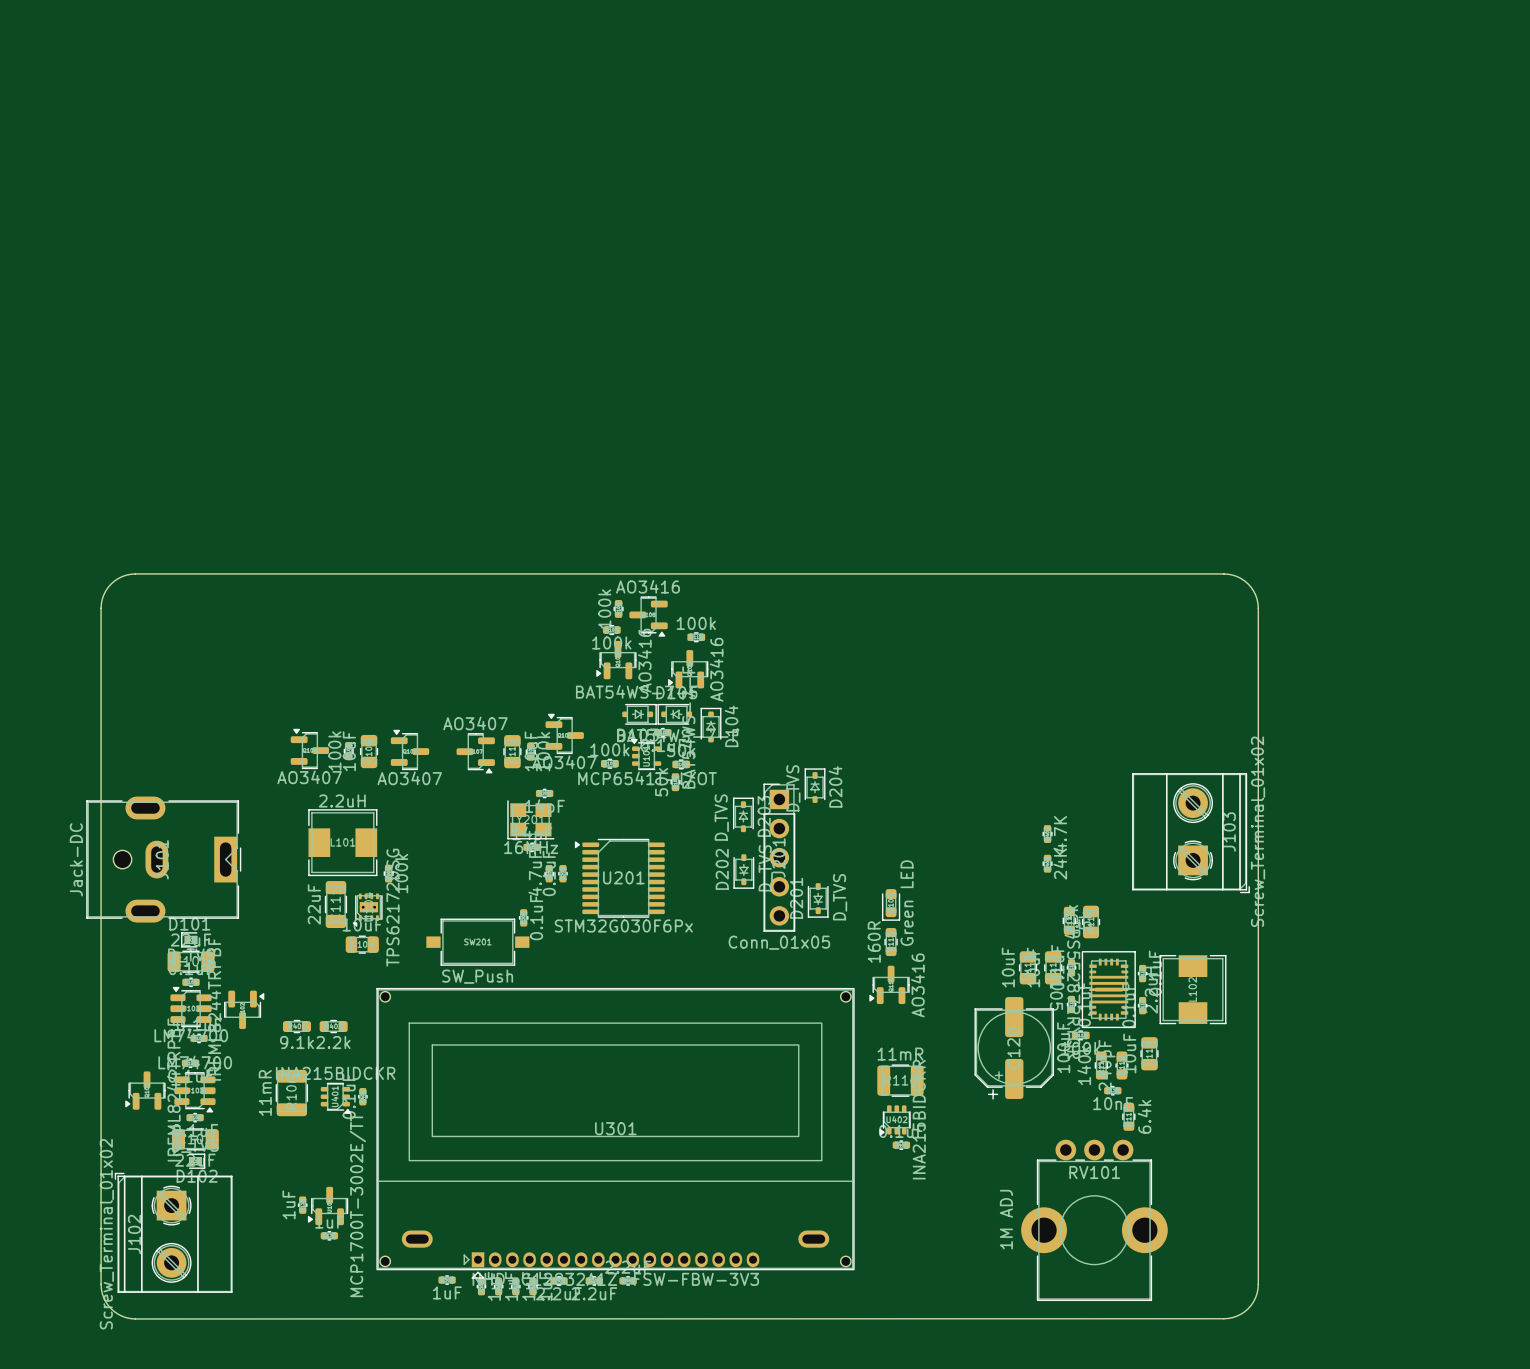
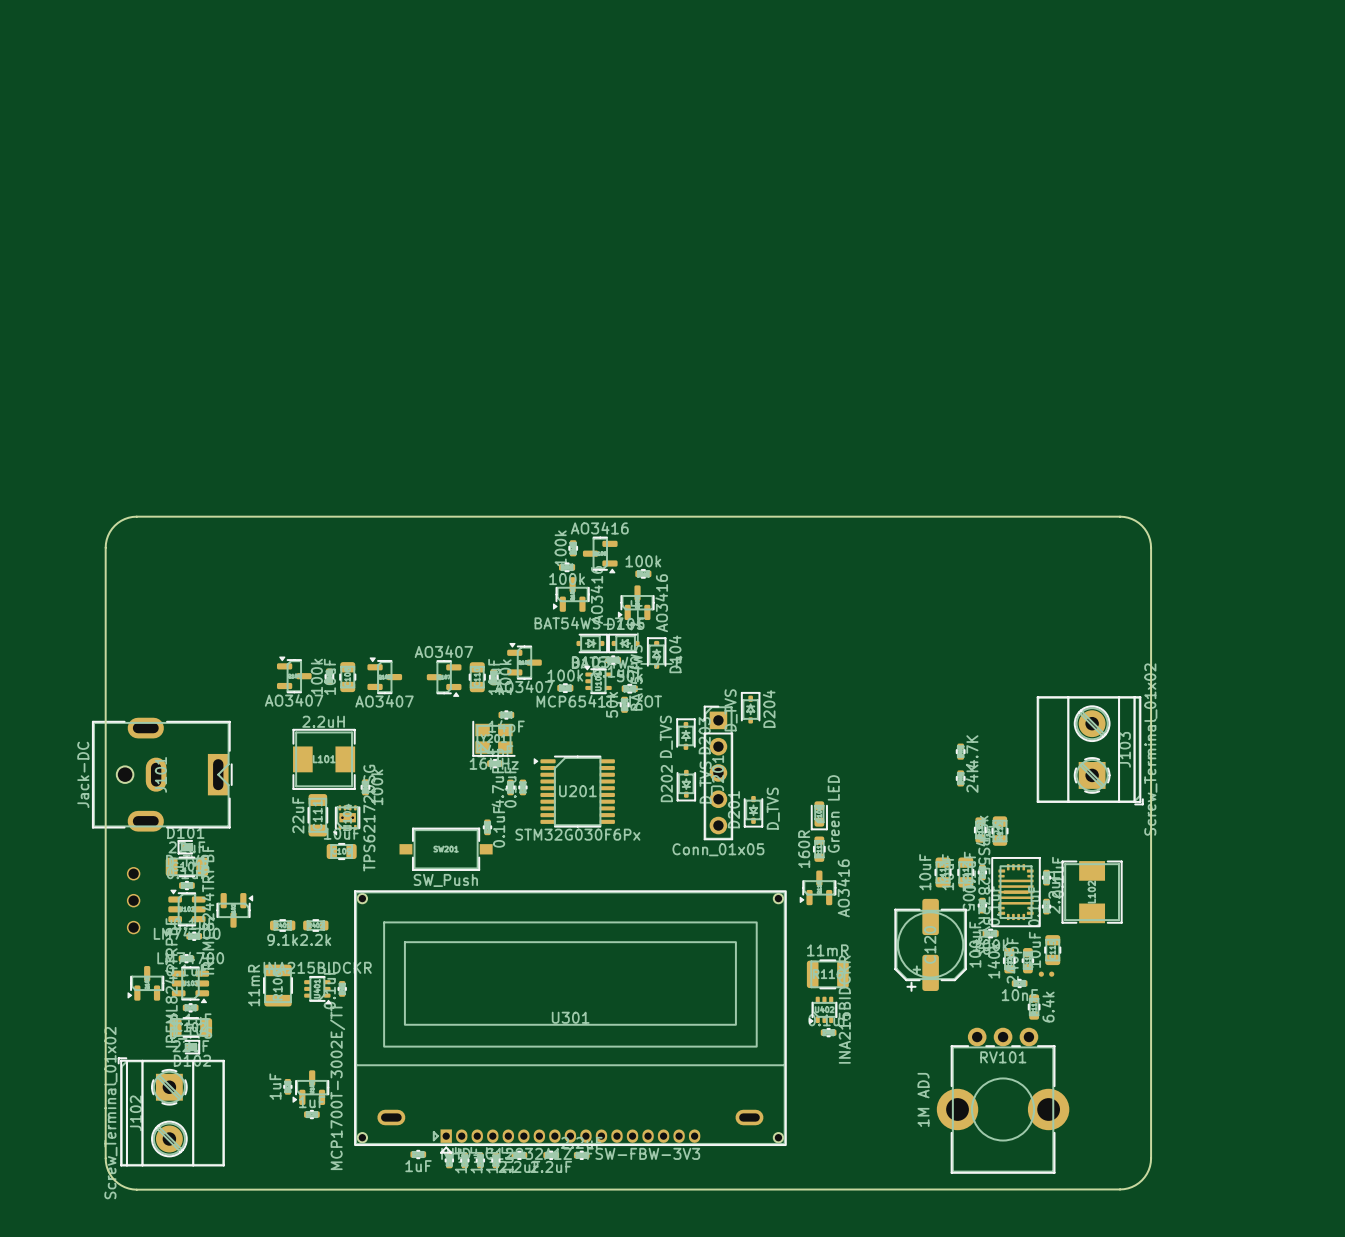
part: none -> (133, 900)
part: none -> (1046, 974)

